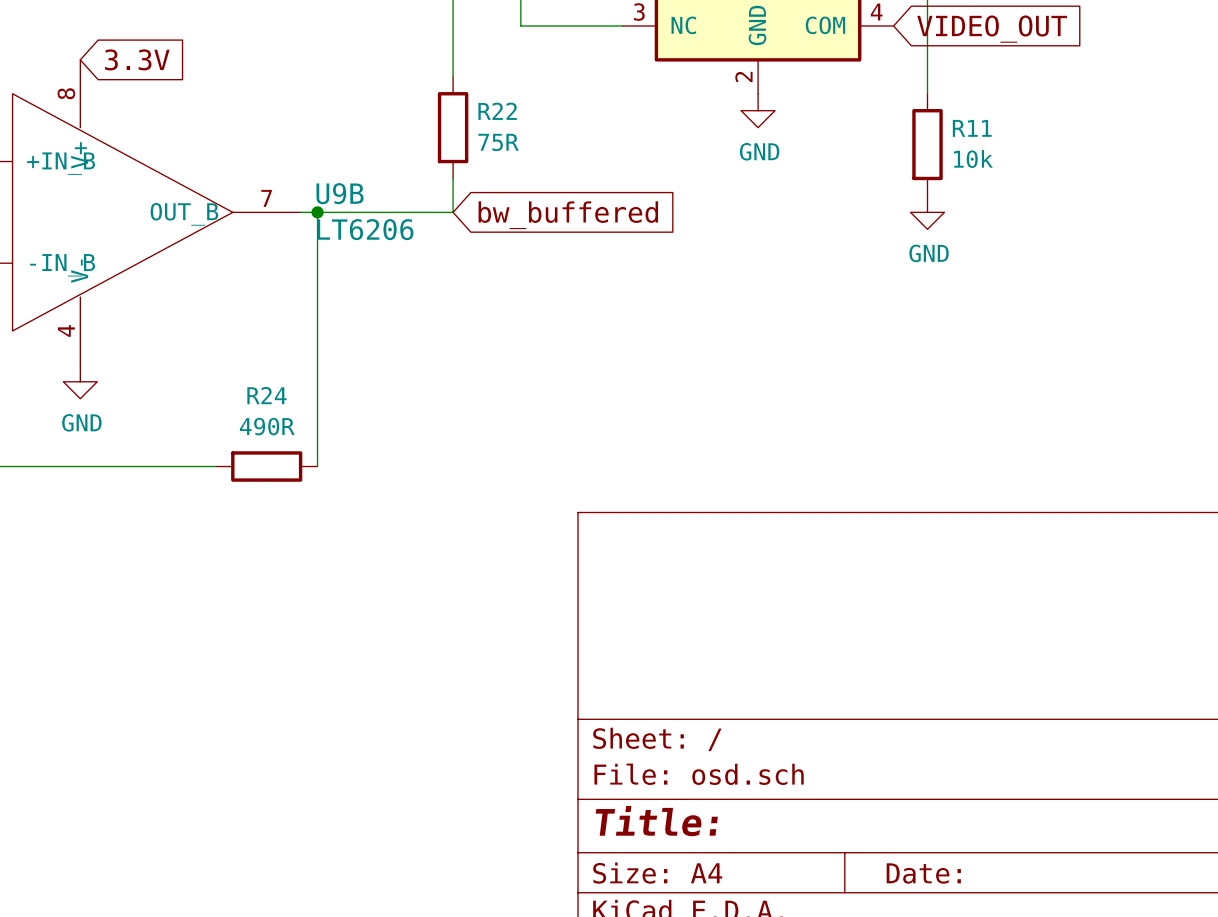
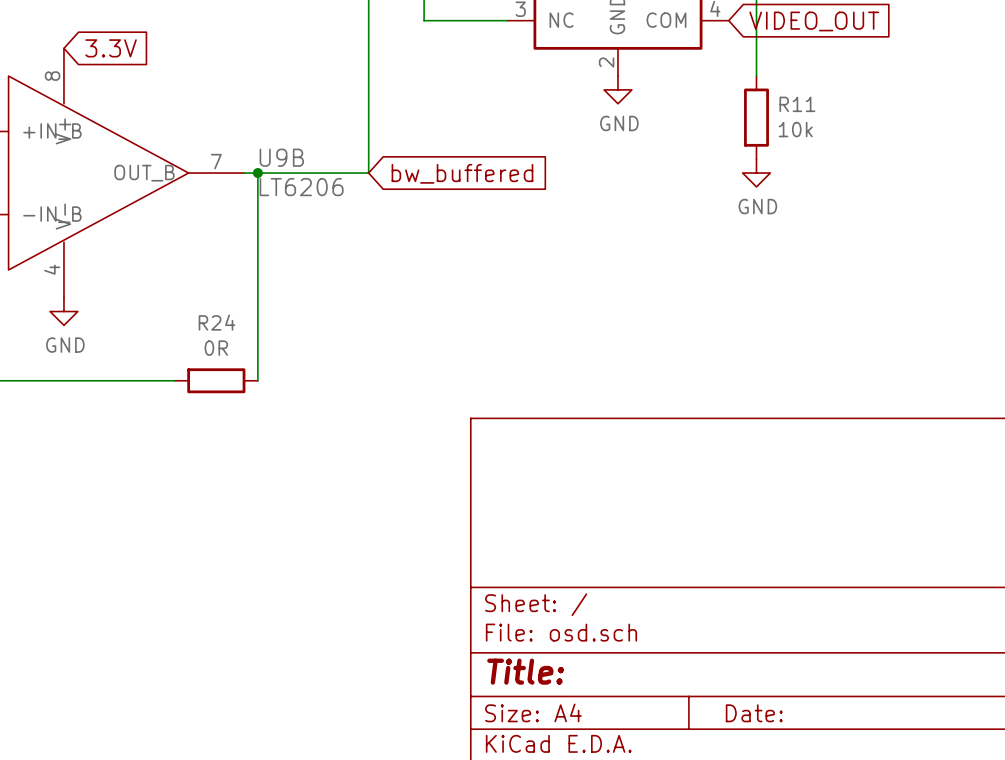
wire: none -> (368, 62) (368, 145)
R22: 75R (453, 127) -> none
R24 value: 490R (267, 426) -> 0R (216, 348)

